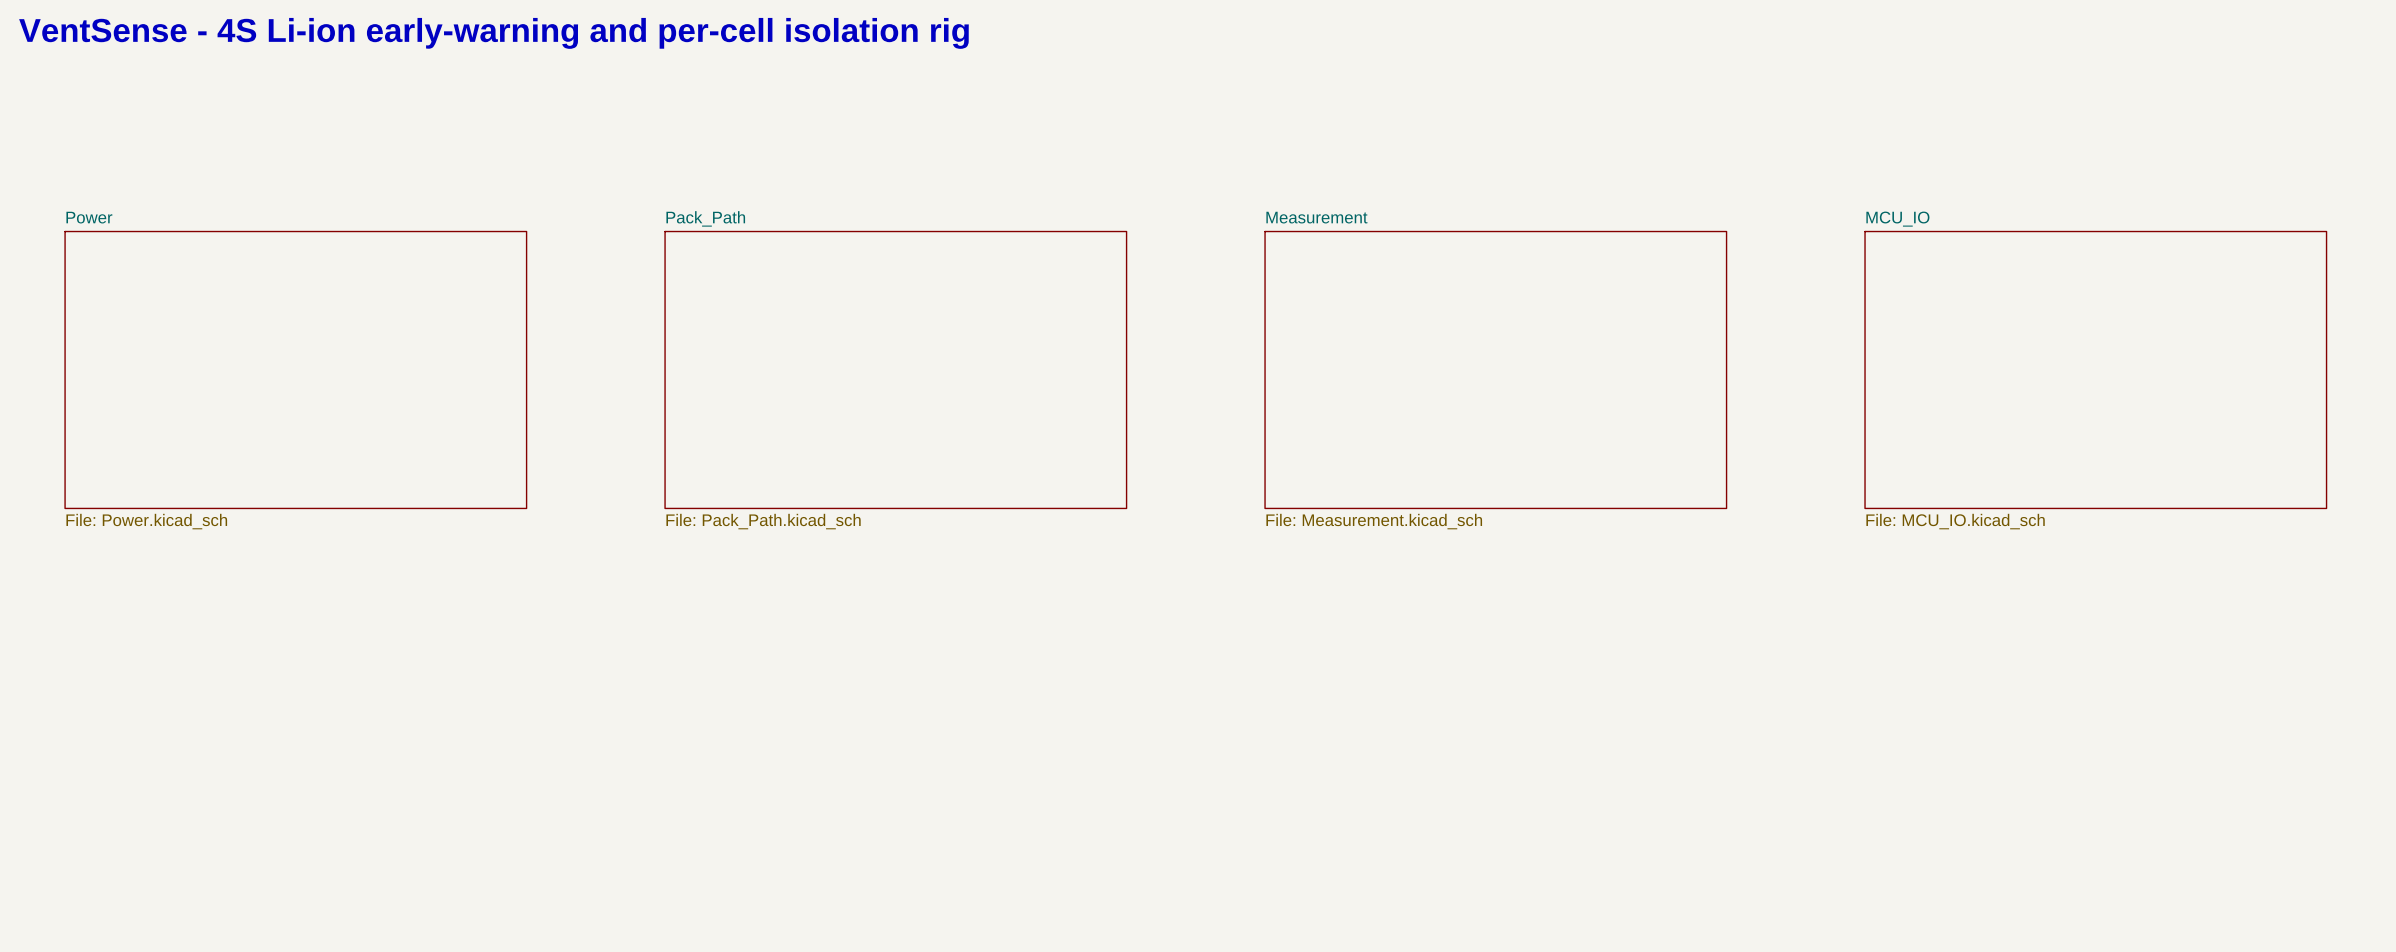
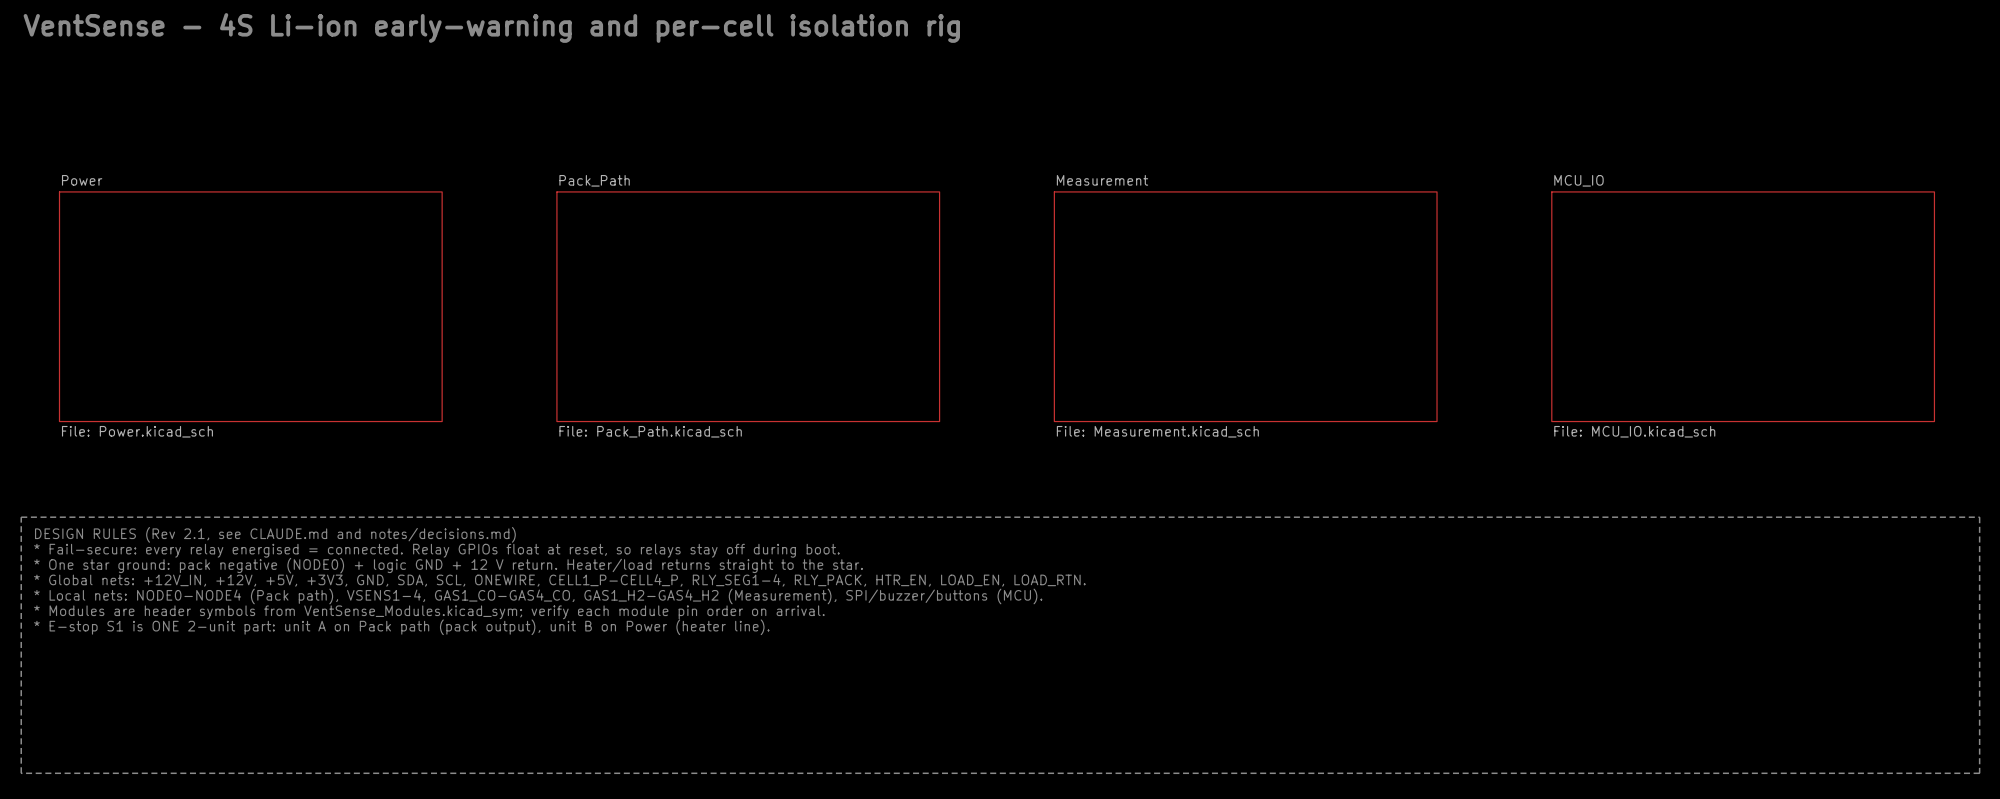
line: none -> (21, 517) (1979, 517) (1979, 773) (21, 773) (21, 517)
text: none -> DESIGN RULES (Rev 2.1, see CLAUDE.md and notes/decisions.md) (275, 534)
text: none -> * Fail-secure: every relay energised = connected. Relay GPIOs float at reset, so relays stay off during boot. (436, 550)
text: none -> * One star ground: pack negative (NODE0) + logic GND + 12 V return. Heater/load returns straight to the star. (448, 565)
text: none -> * Global nets: +12V_IN, +12V, +5V, +3V3, GND, SDA, SCL, ONEWIRE, CELL1_P-CELL4_P, RLY_SEG1-4, RLY_PACK, HTR_EN, LOAD_EN, LOAD_RTN. (559, 580)
text: none -> * Local nets: NODE0-NODE4 (Pack path), VSENS1-4, GAS1_CO-GAS4_CO, GAS1_H2-GAS4_H2 (Measurement), SPI/buzzer/buttons (MCU). (538, 596)
text: none -> * Modules are header symbols from VentSense_Modules.kicad_sym; verify each module pin order on arrival. (429, 612)
text: none -> * E-stop S1 is ONE 2-unit part: unit A on Pack path (pack output), unit B on Power (heater line). (401, 627)

